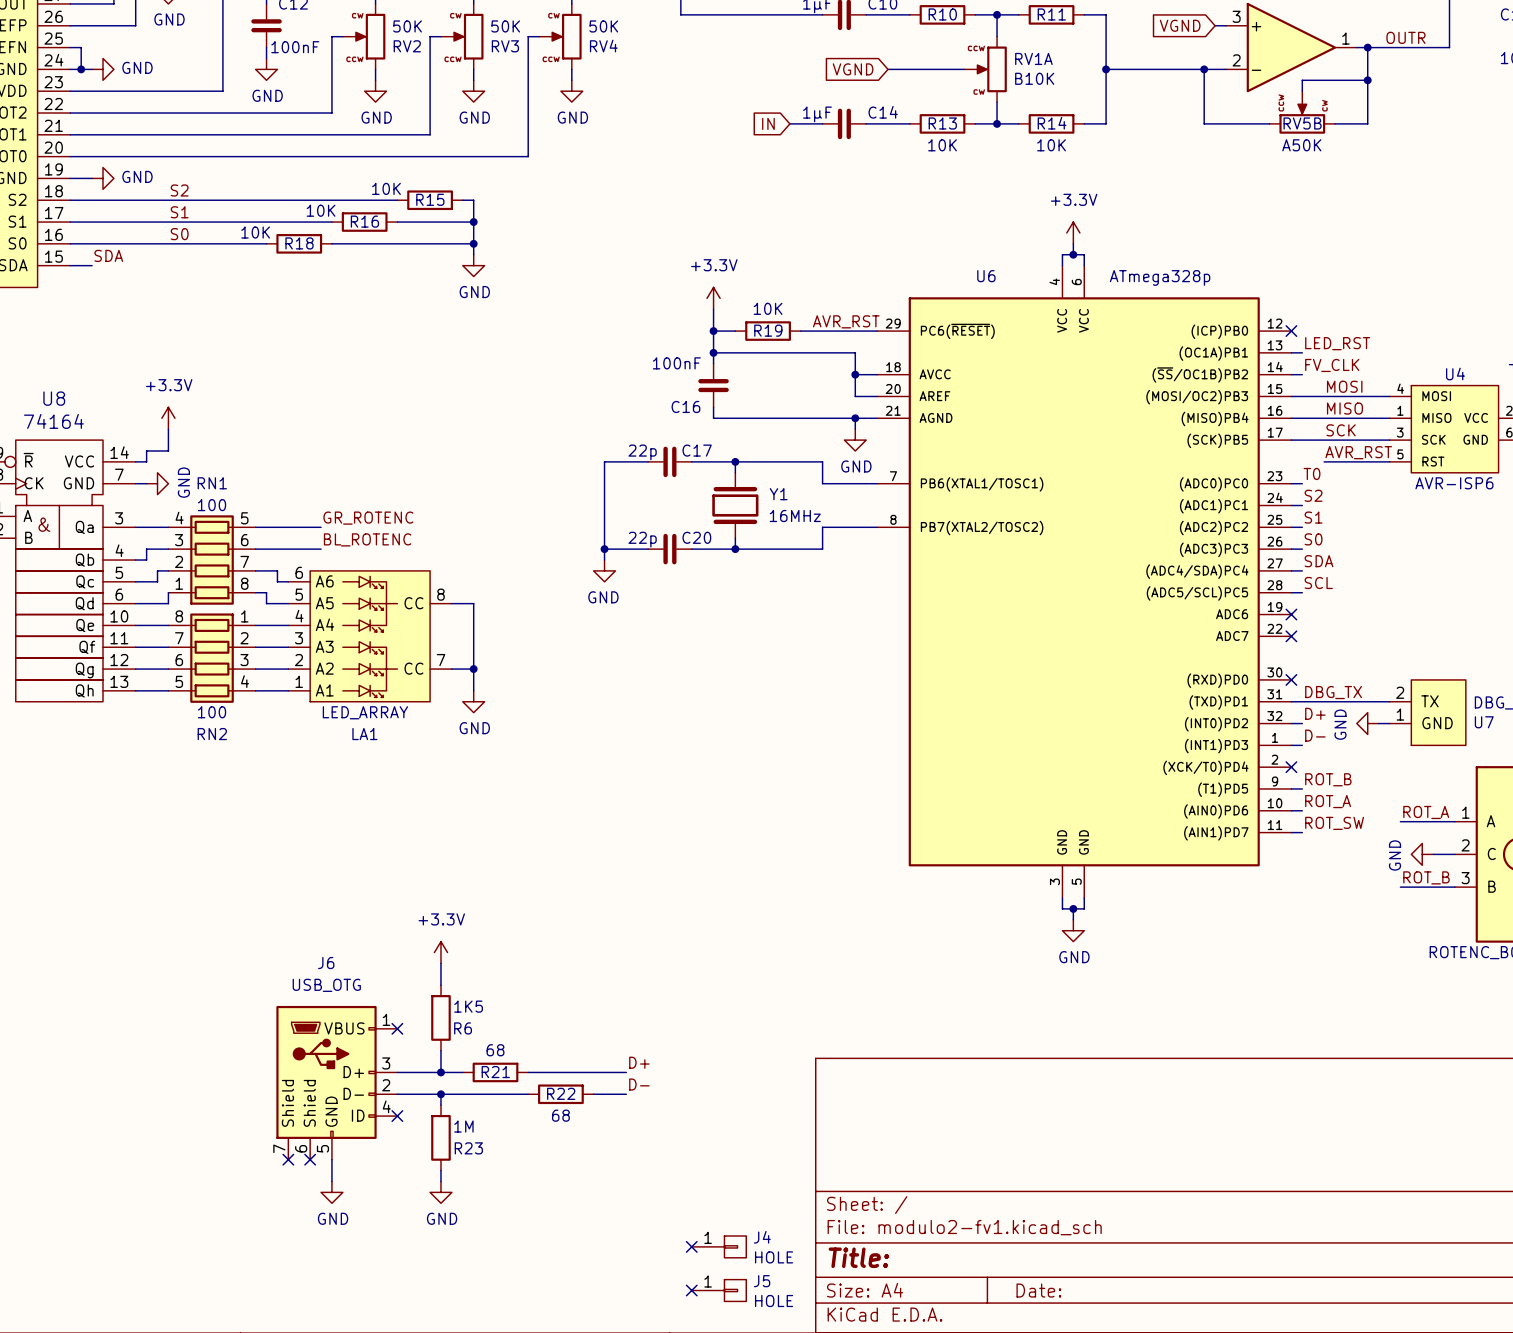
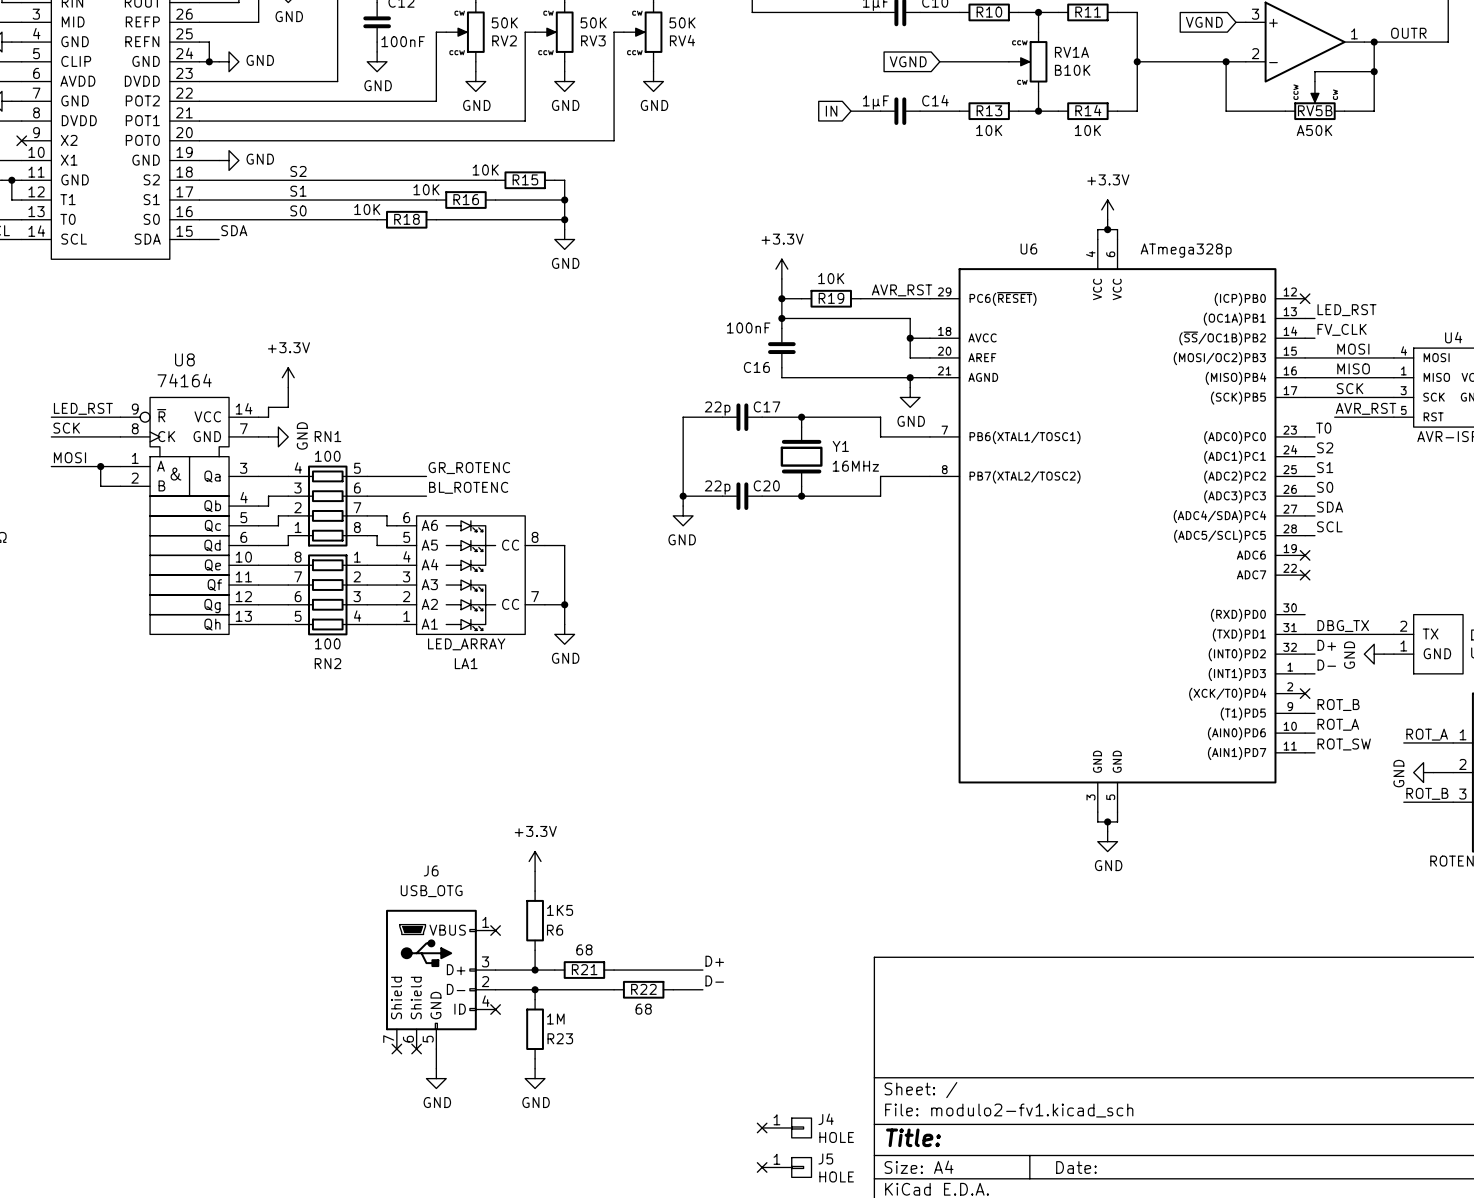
no-connect mark: (1291, 679) -> none

